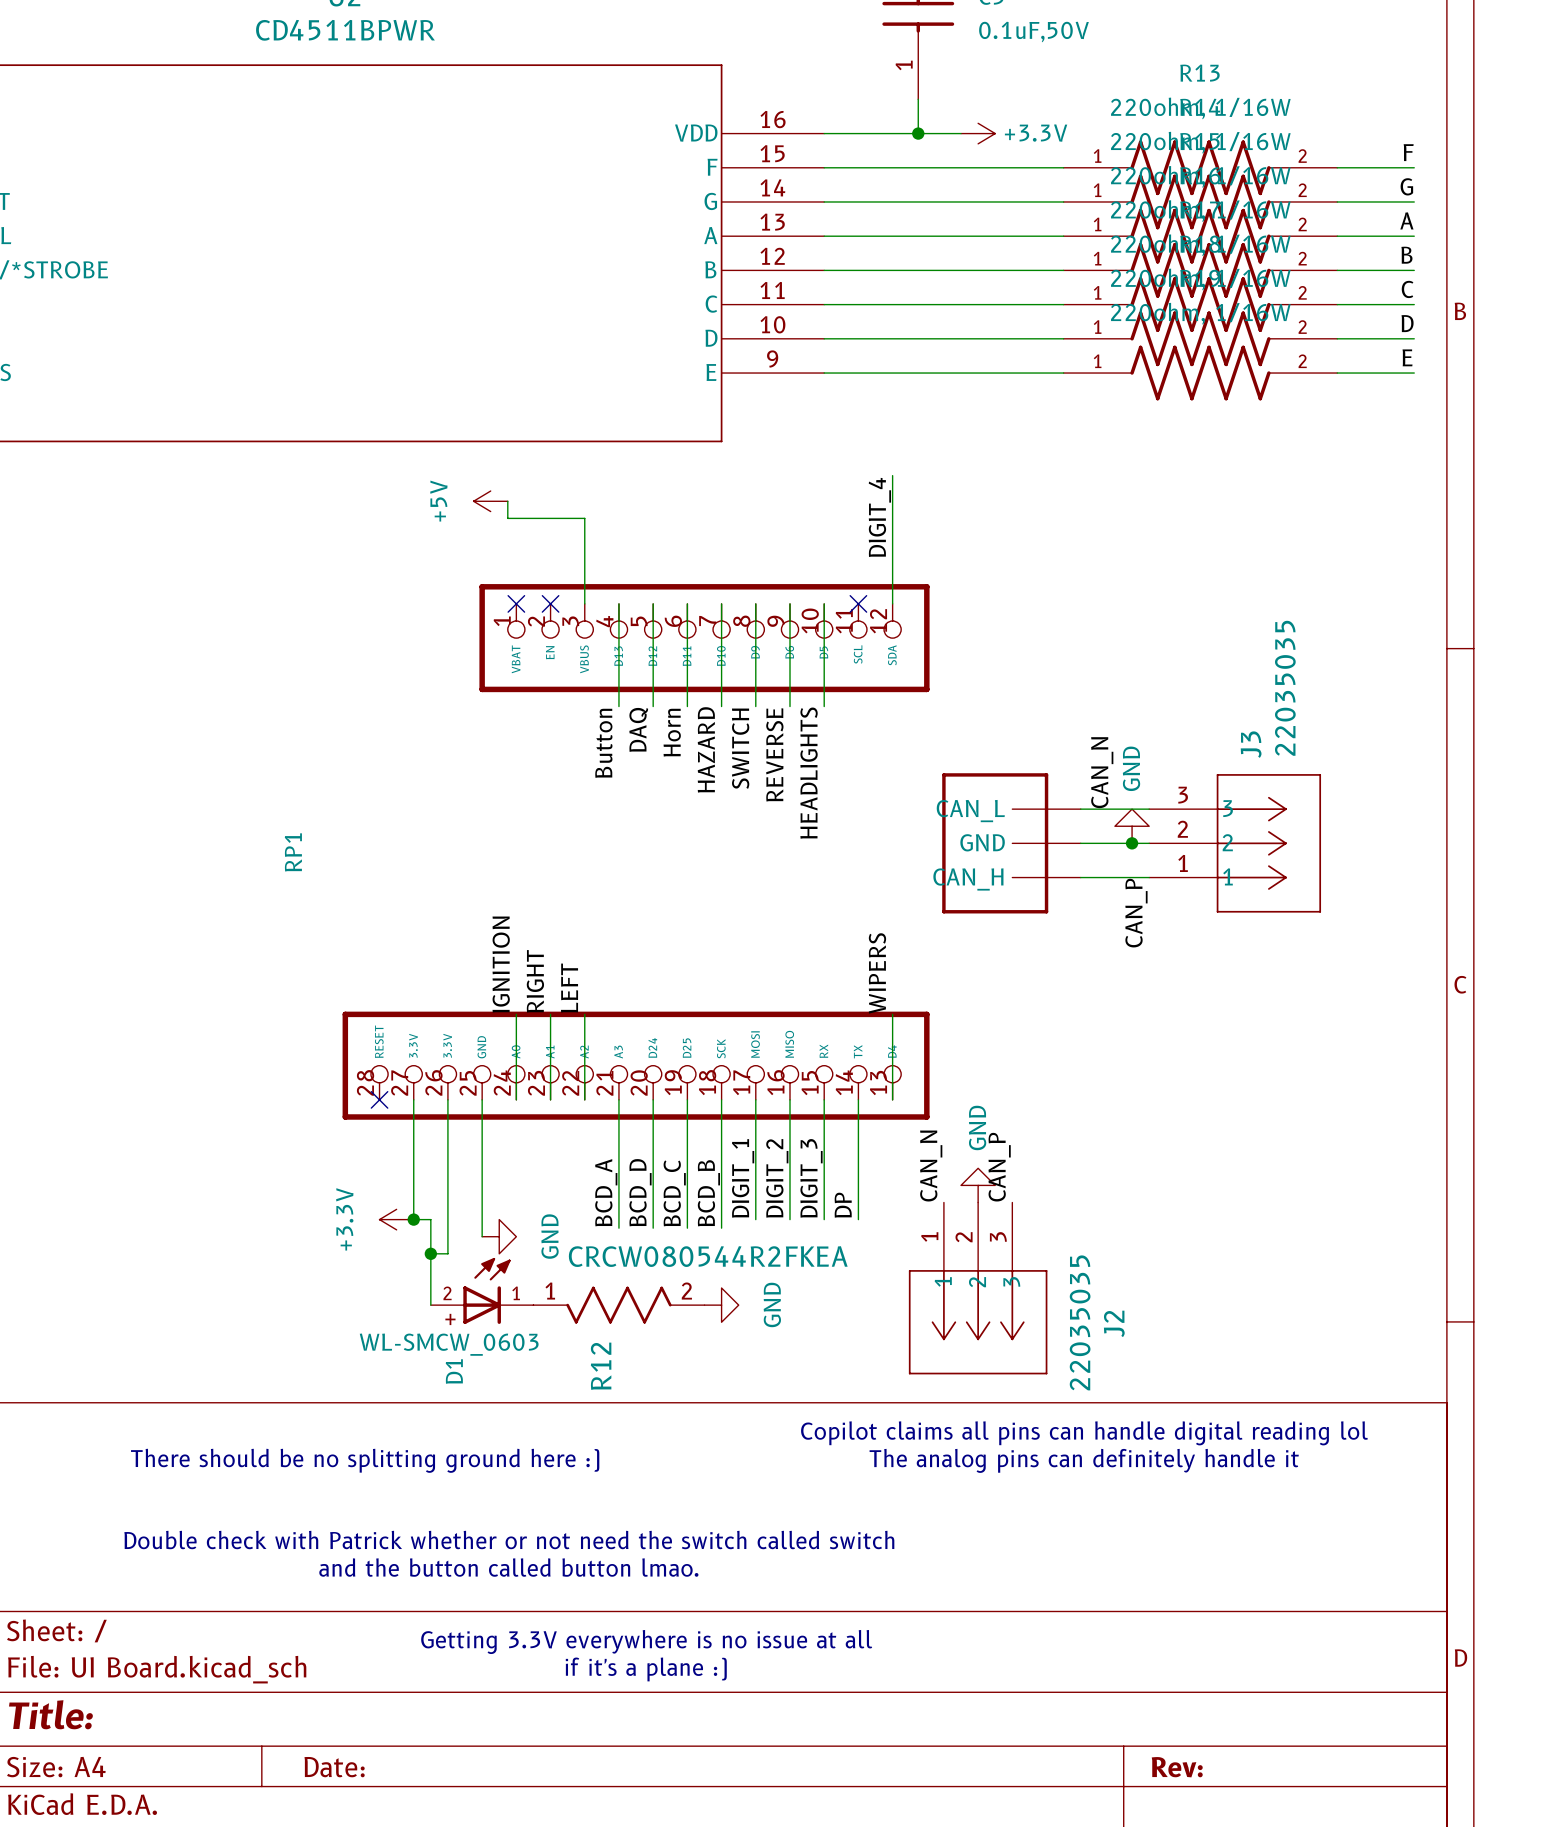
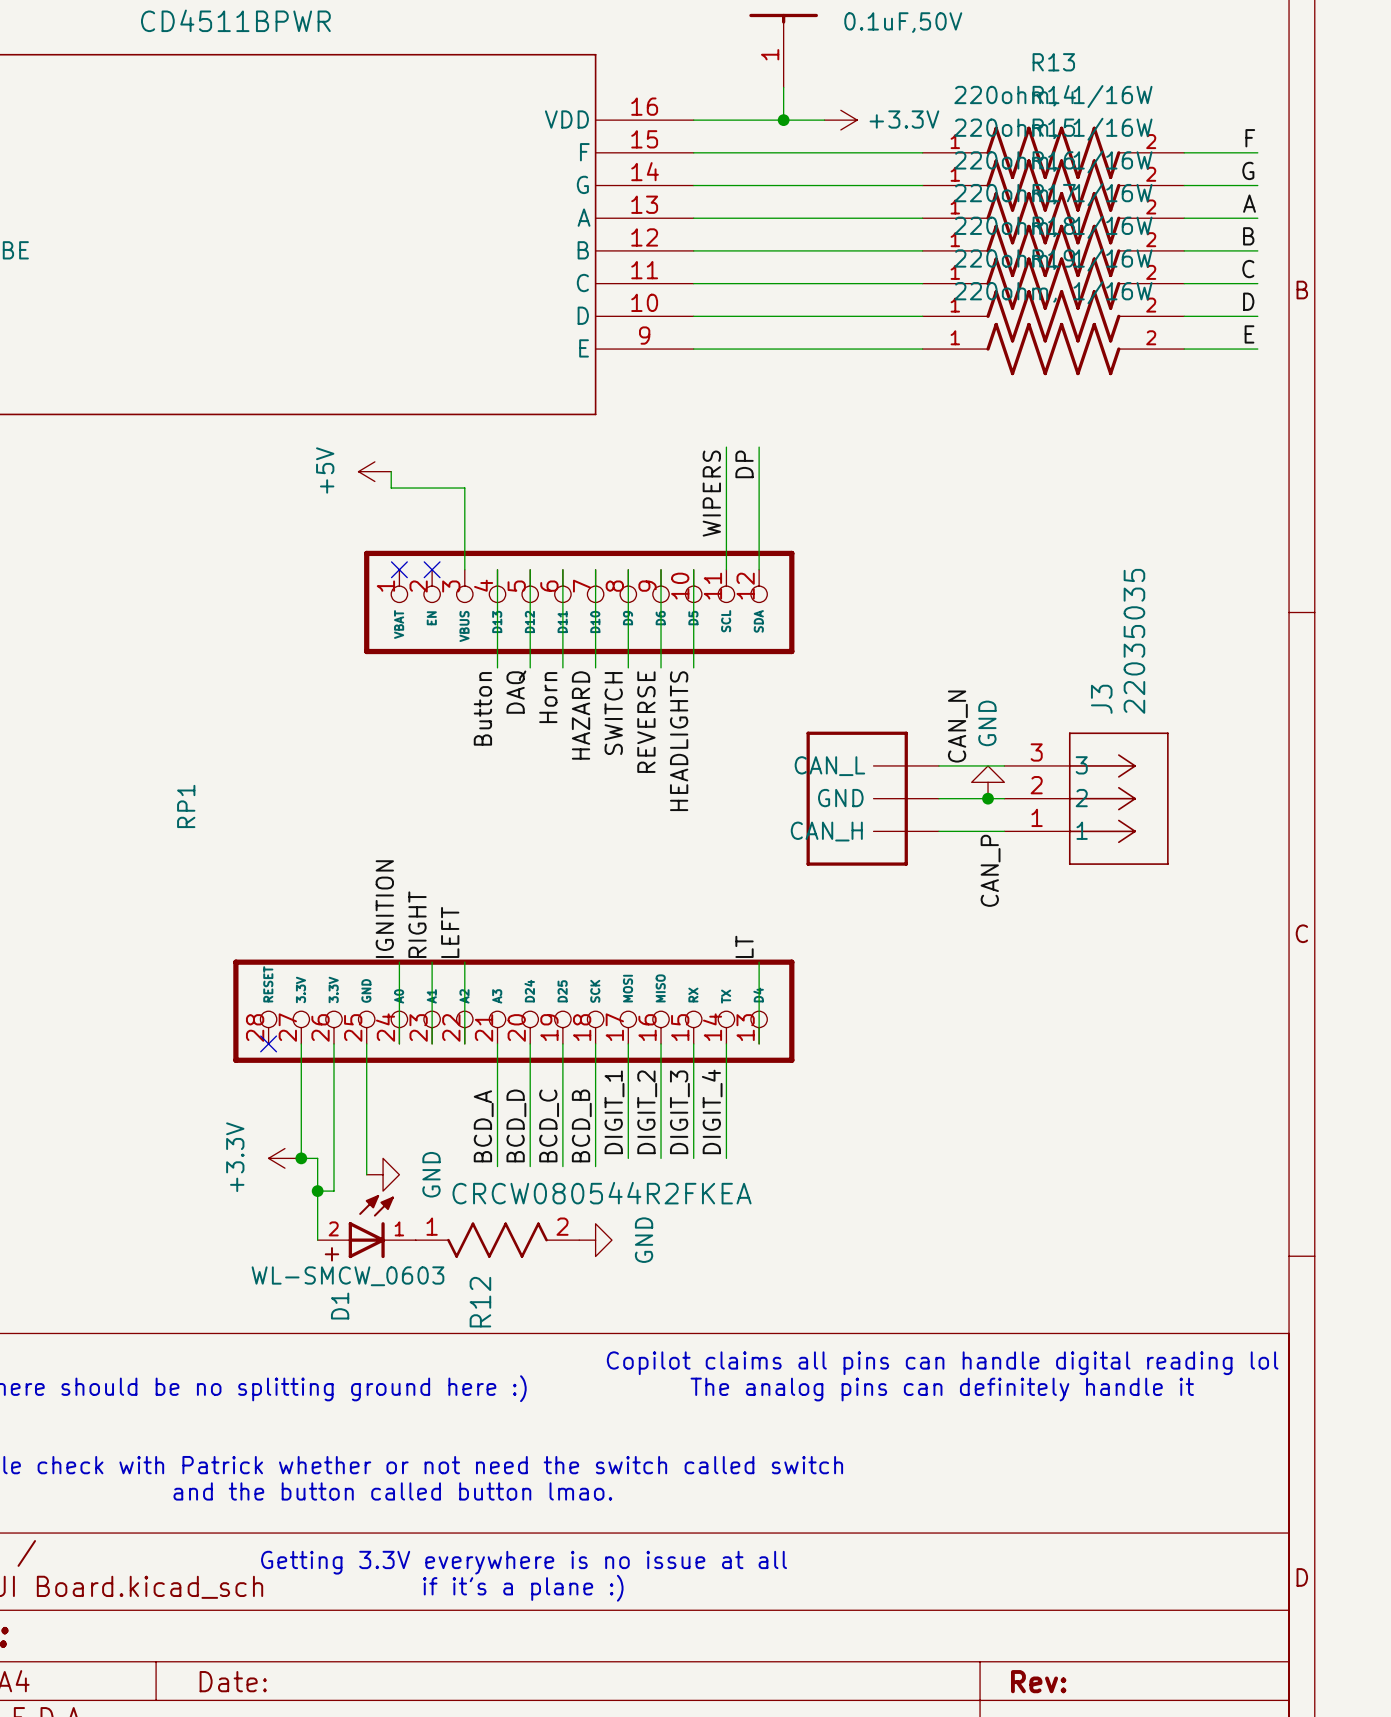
wire: none -> (726, 447) (726, 569)
label: none -> WIPERS (711, 493)
label: DIGIT_4 (879, 517) -> DP (744, 464)
no-connect mark: (858, 603) -> none
label: WIPERS (877, 973) -> LT (744, 946)
label: CAN_N (931, 1166) -> none
label: CAN_P (999, 1167) -> none
power symbol: GND (978, 1185) -> none
label: DP (843, 1205) -> DIGIT_4 (712, 1111)
J2: 22035035 (978, 1288) -> none

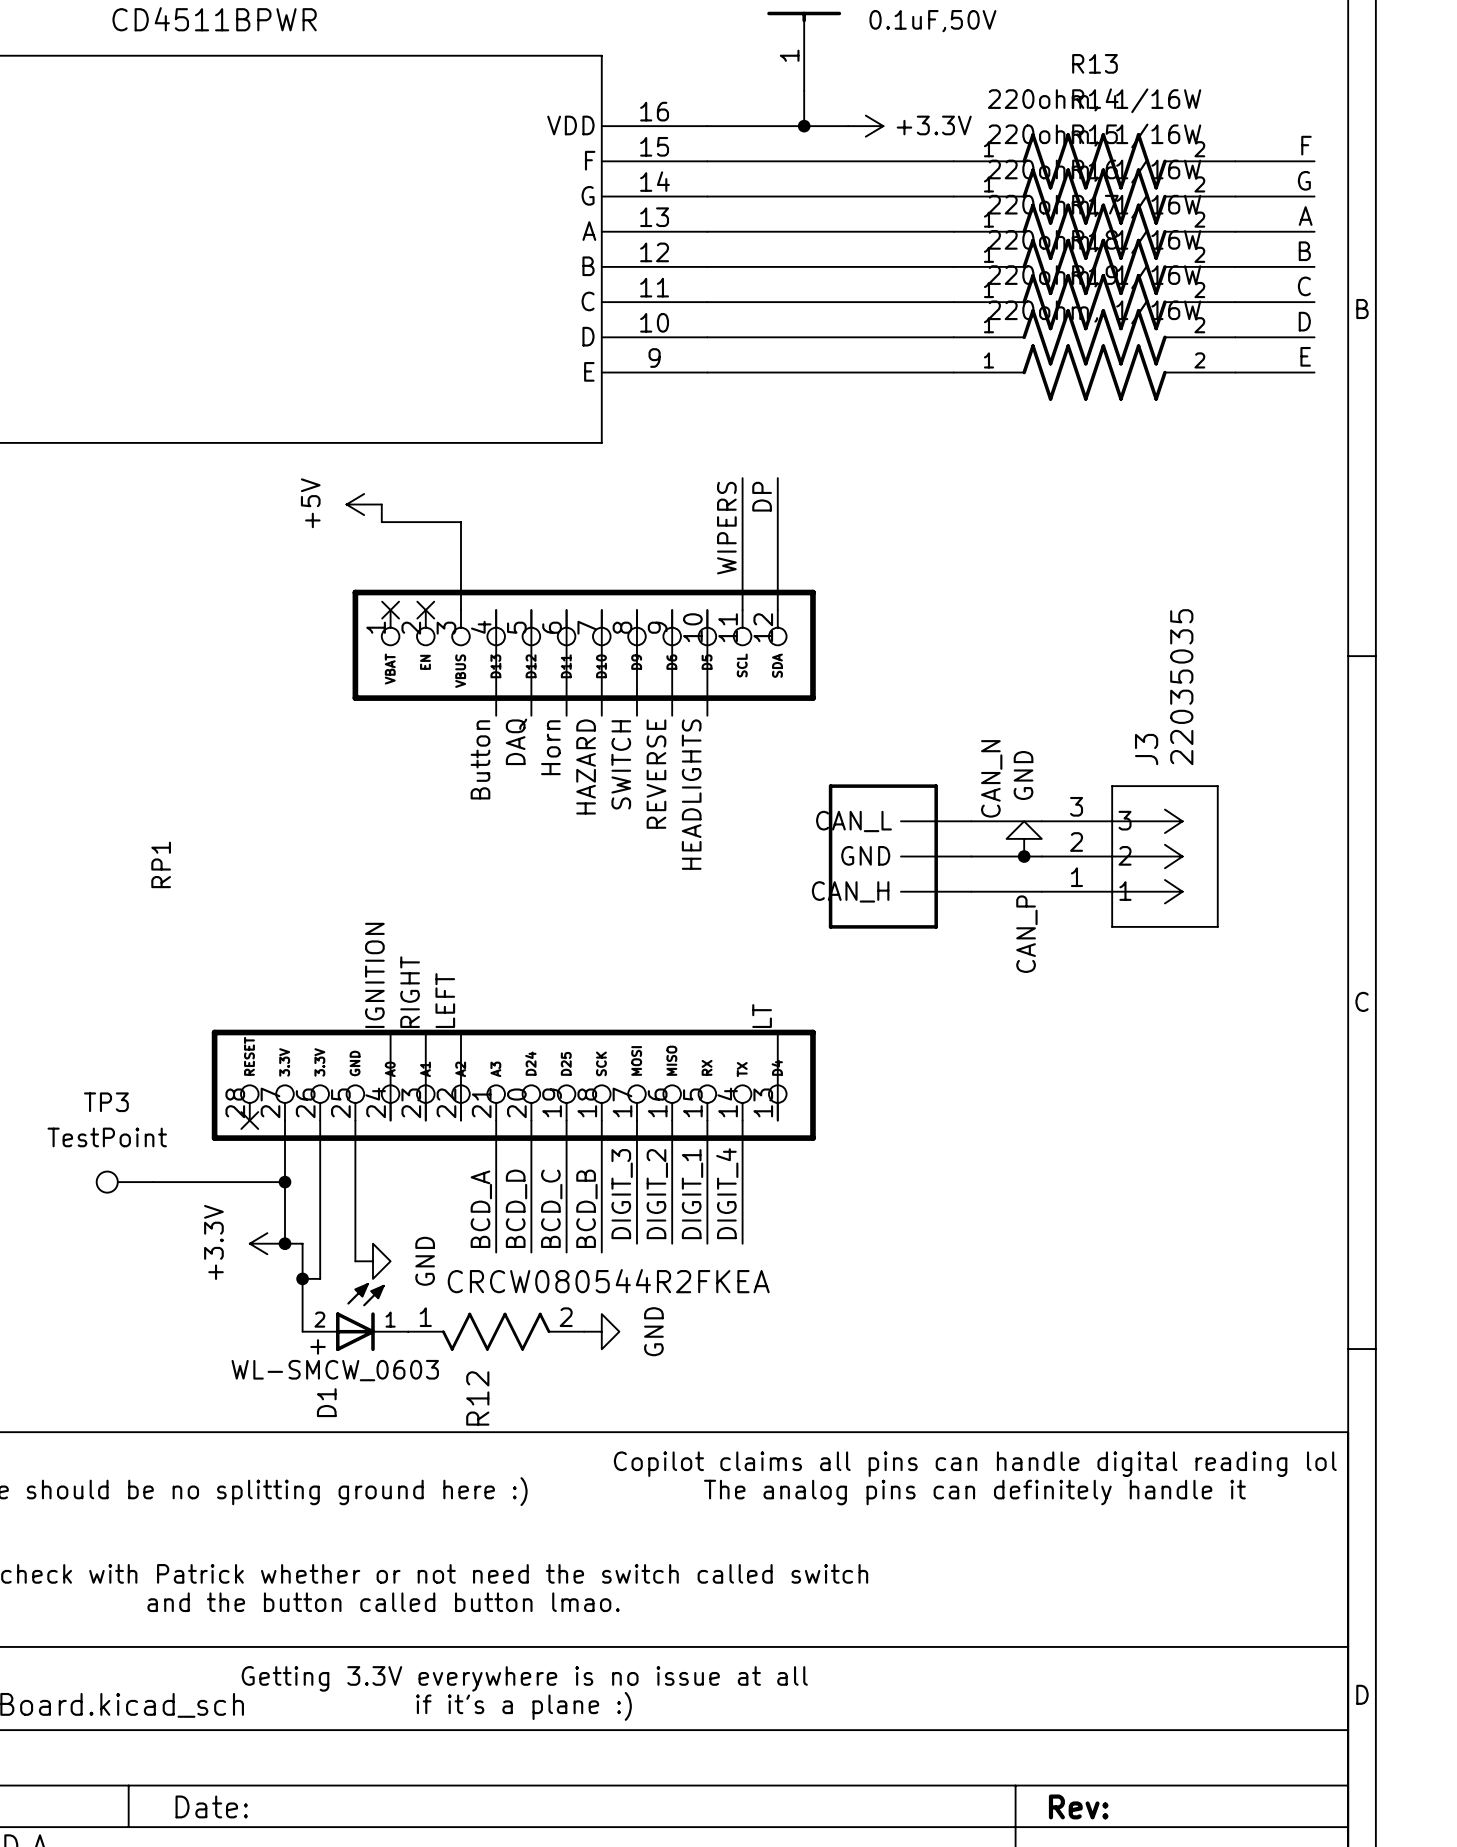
TP3: none -> TestPoint (124, 1182)
wire: none -> (152, 1182) (284, 1182)
junction: none -> (284, 1182)
label: DIGIT_1 (614, 1112) -> DIGIT_3 (622, 1194)
label: DIGIT_3 (679, 1112) -> DIGIT_1 (692, 1194)

